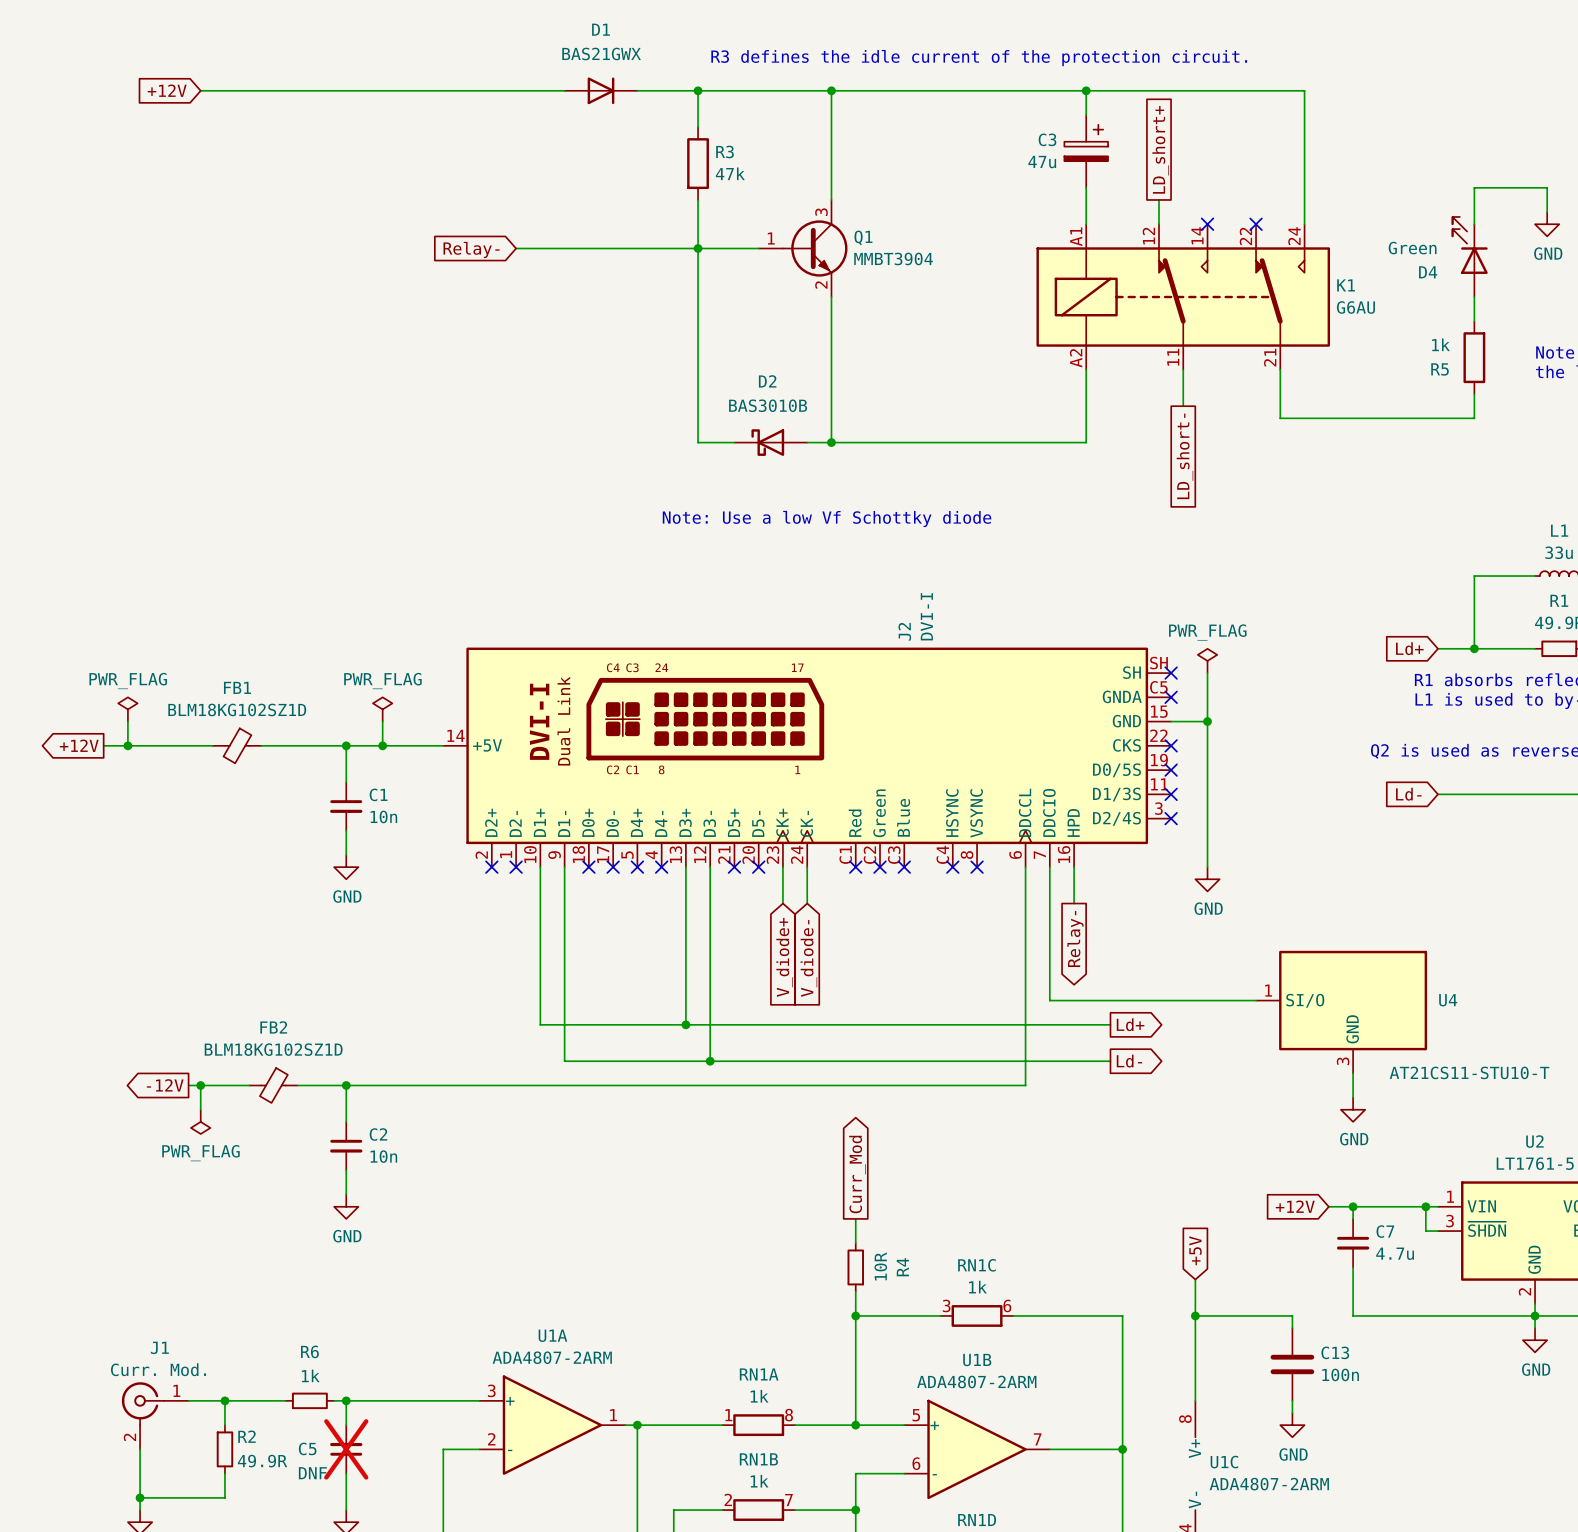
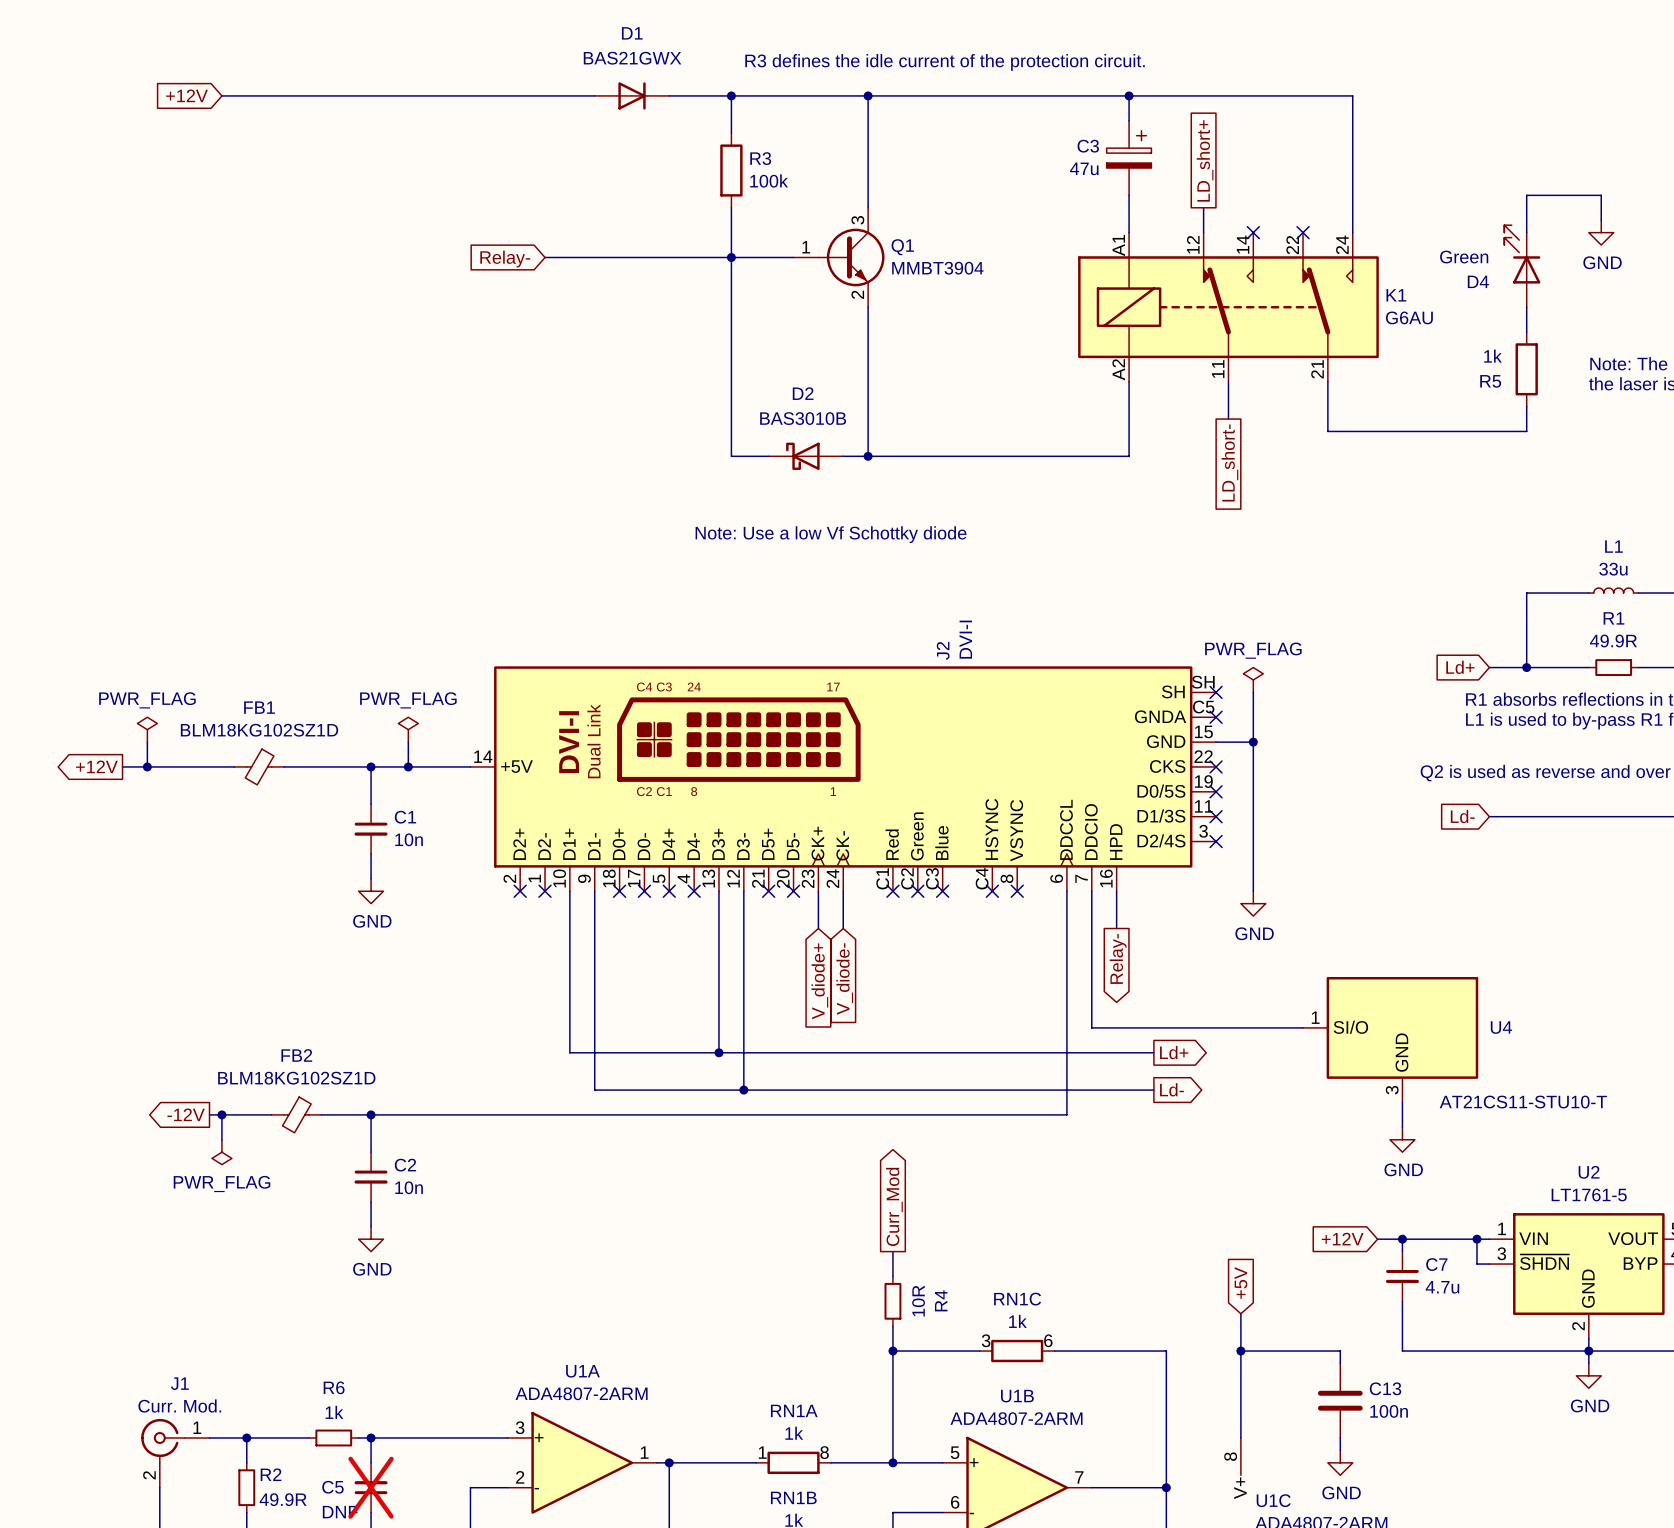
R3 value: 47k (730, 173) -> 100k (769, 180)

